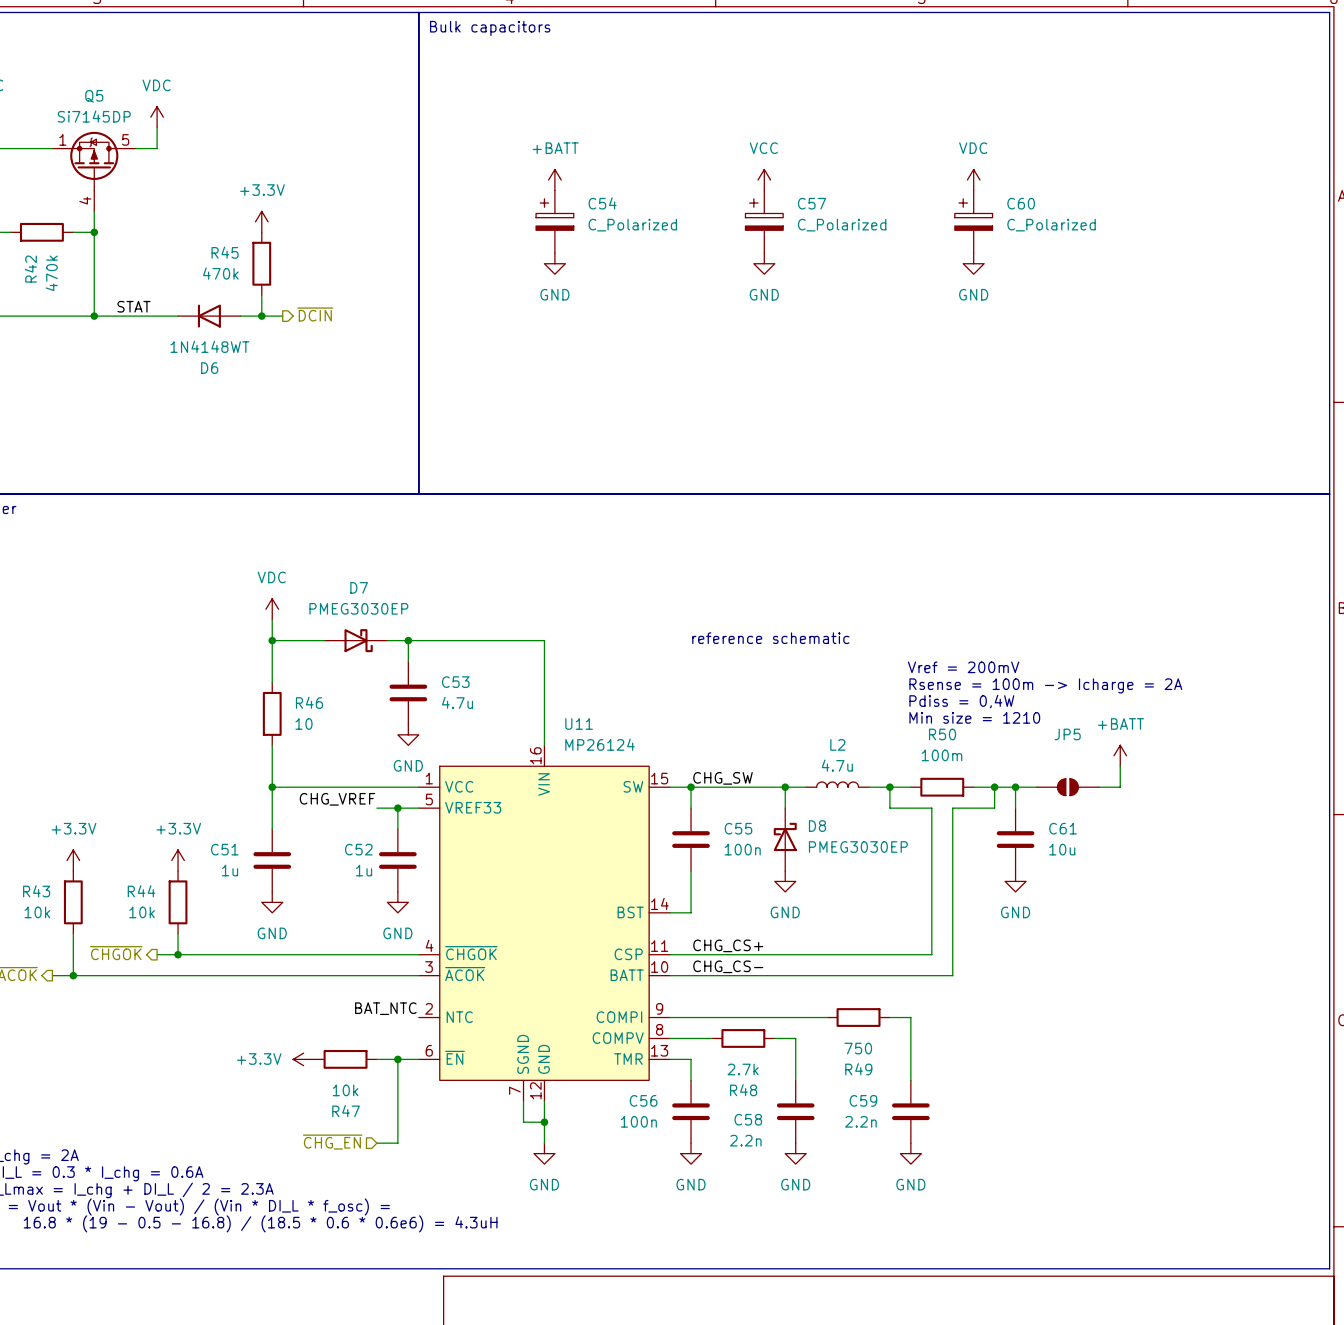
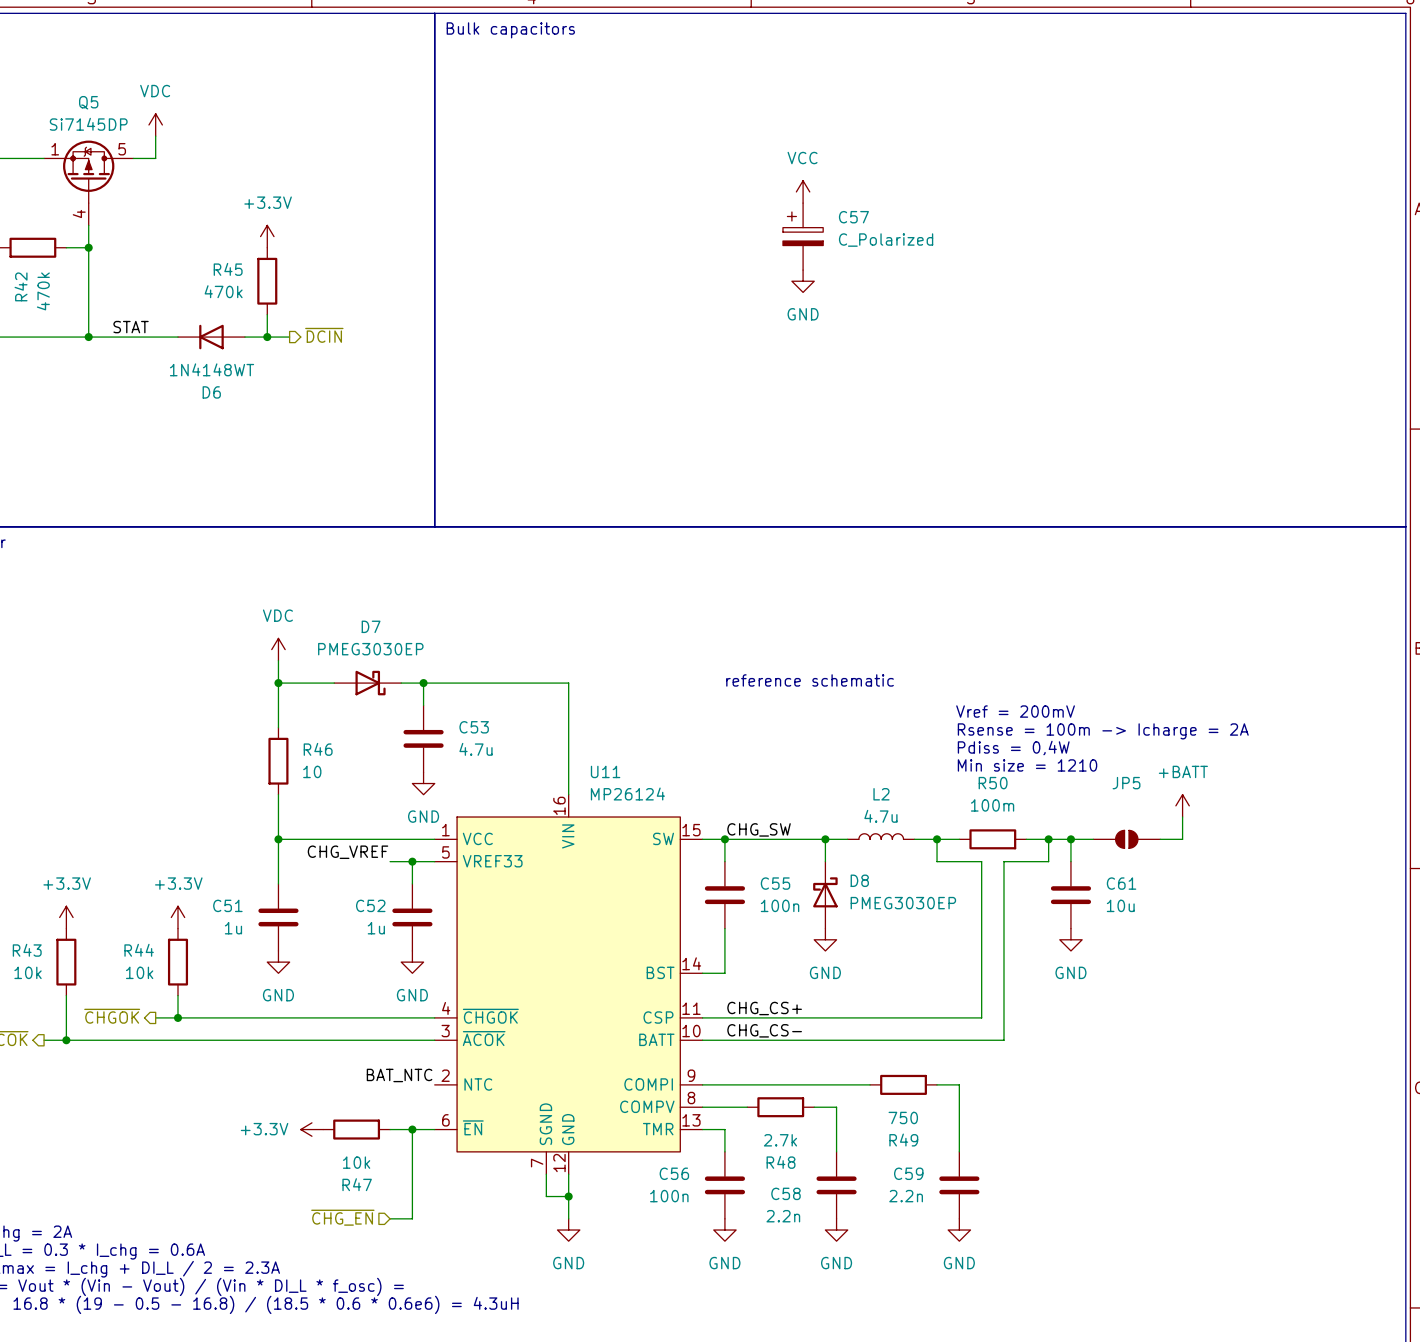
power symbol: +BATT (554, 179) -> none
power symbol: VDC (973, 179) -> none
C54: C_Polarized (554, 221) -> none
C60: C_Polarized (973, 221) -> none
power symbol: GND (554, 263) -> none
power symbol: GND (973, 263) -> none

